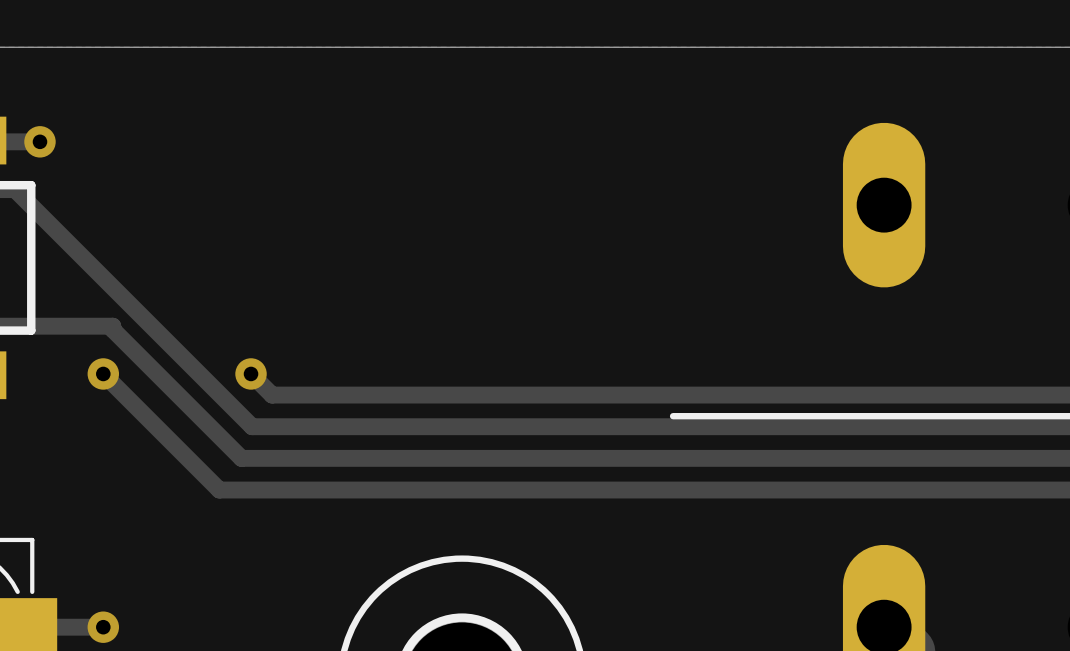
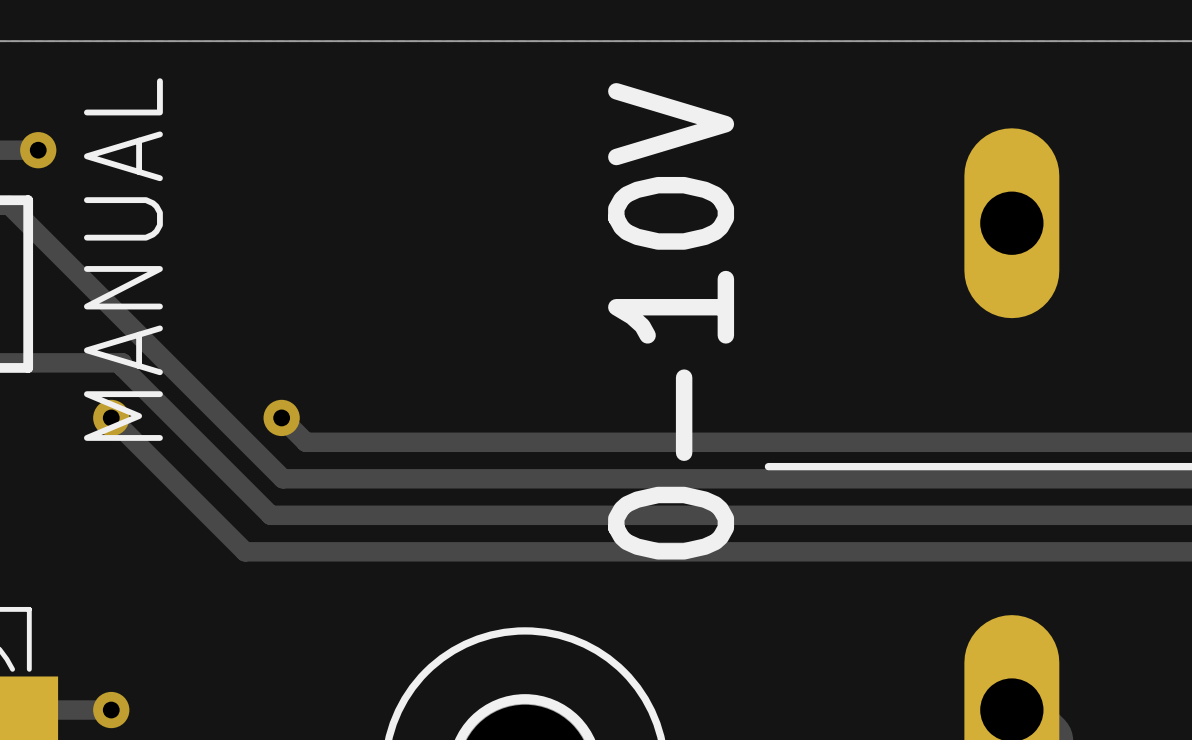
text: none -> 0-10V (671, 321)
text: none -> MANUAL (123, 259)

